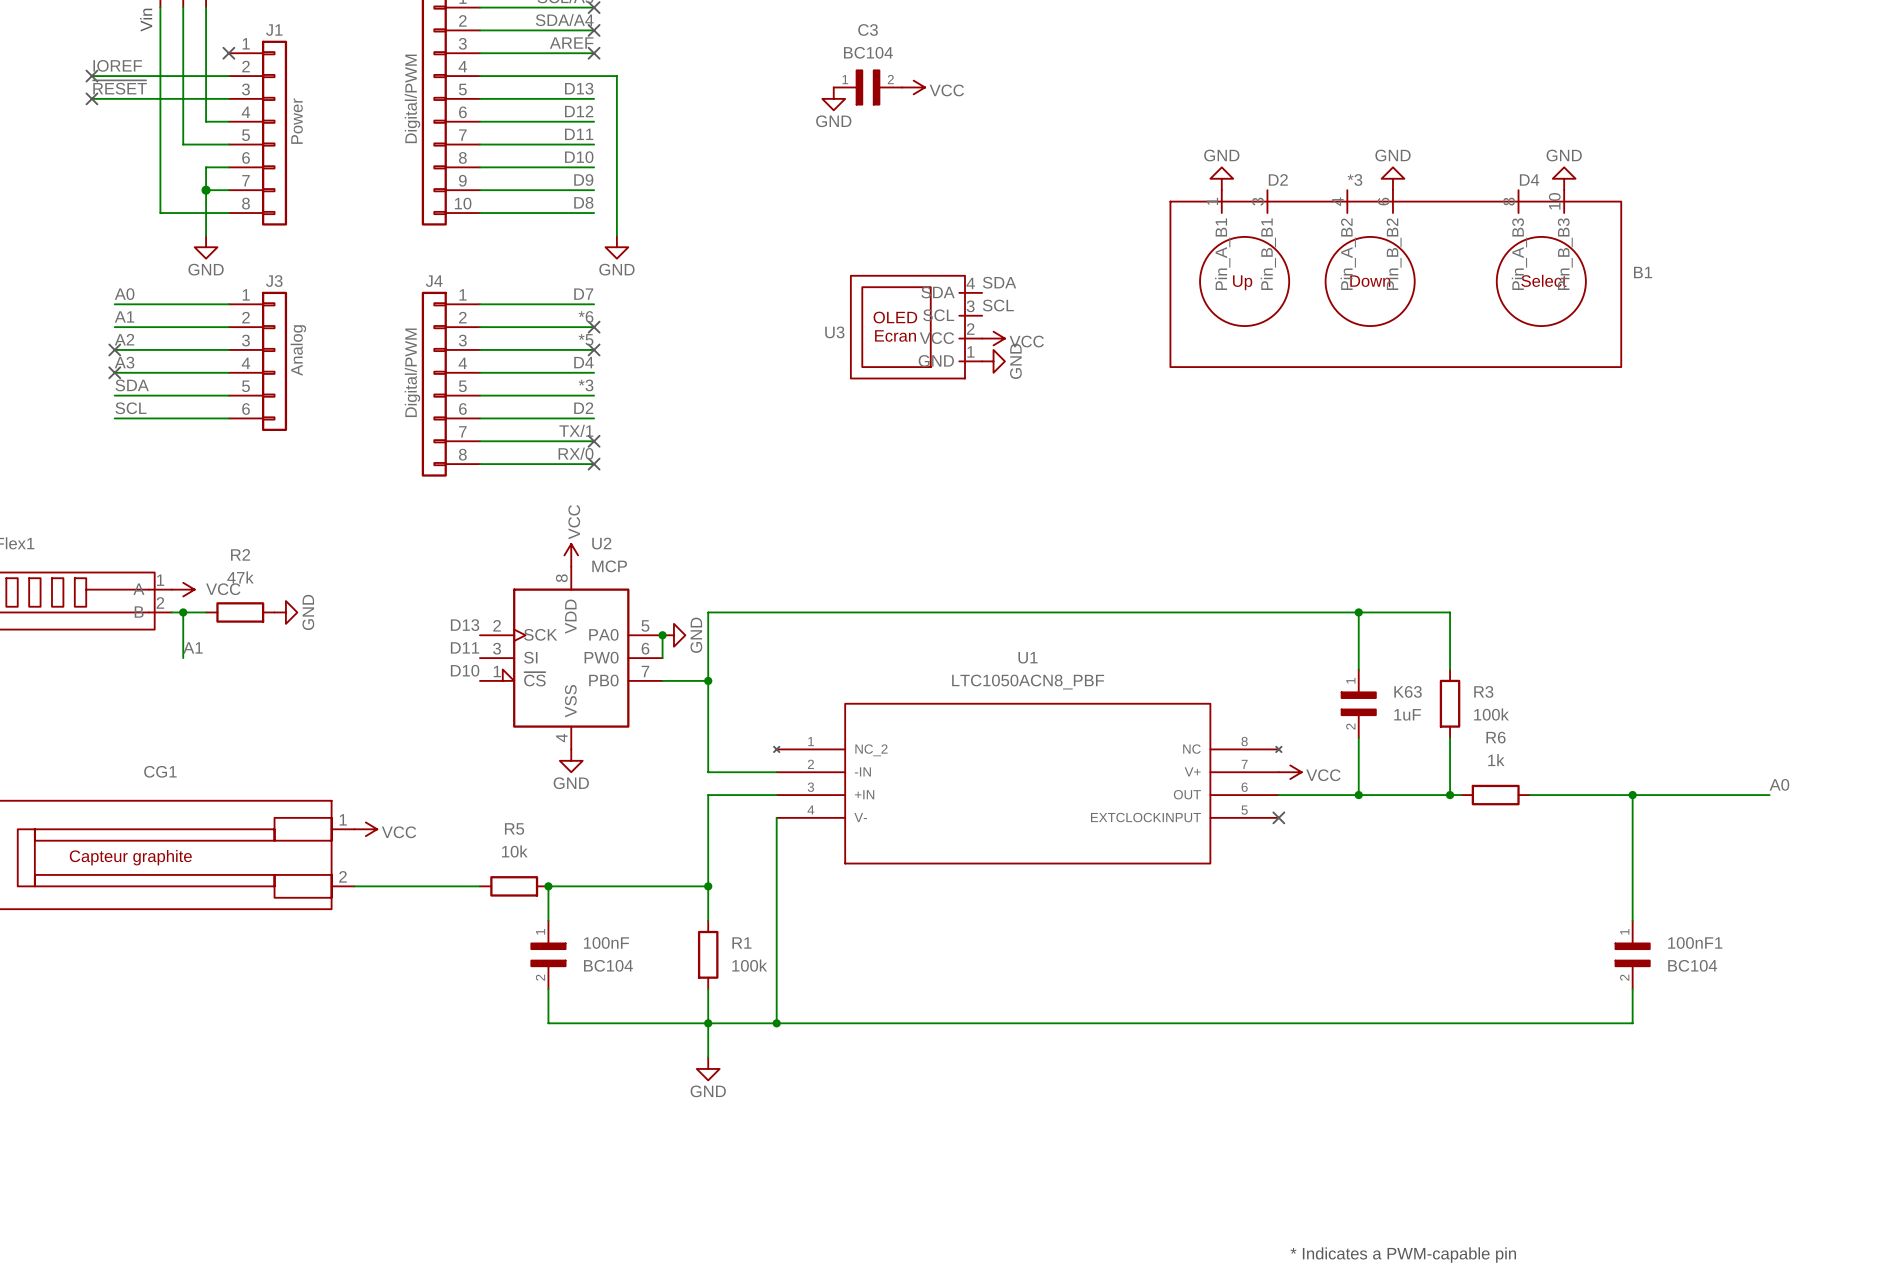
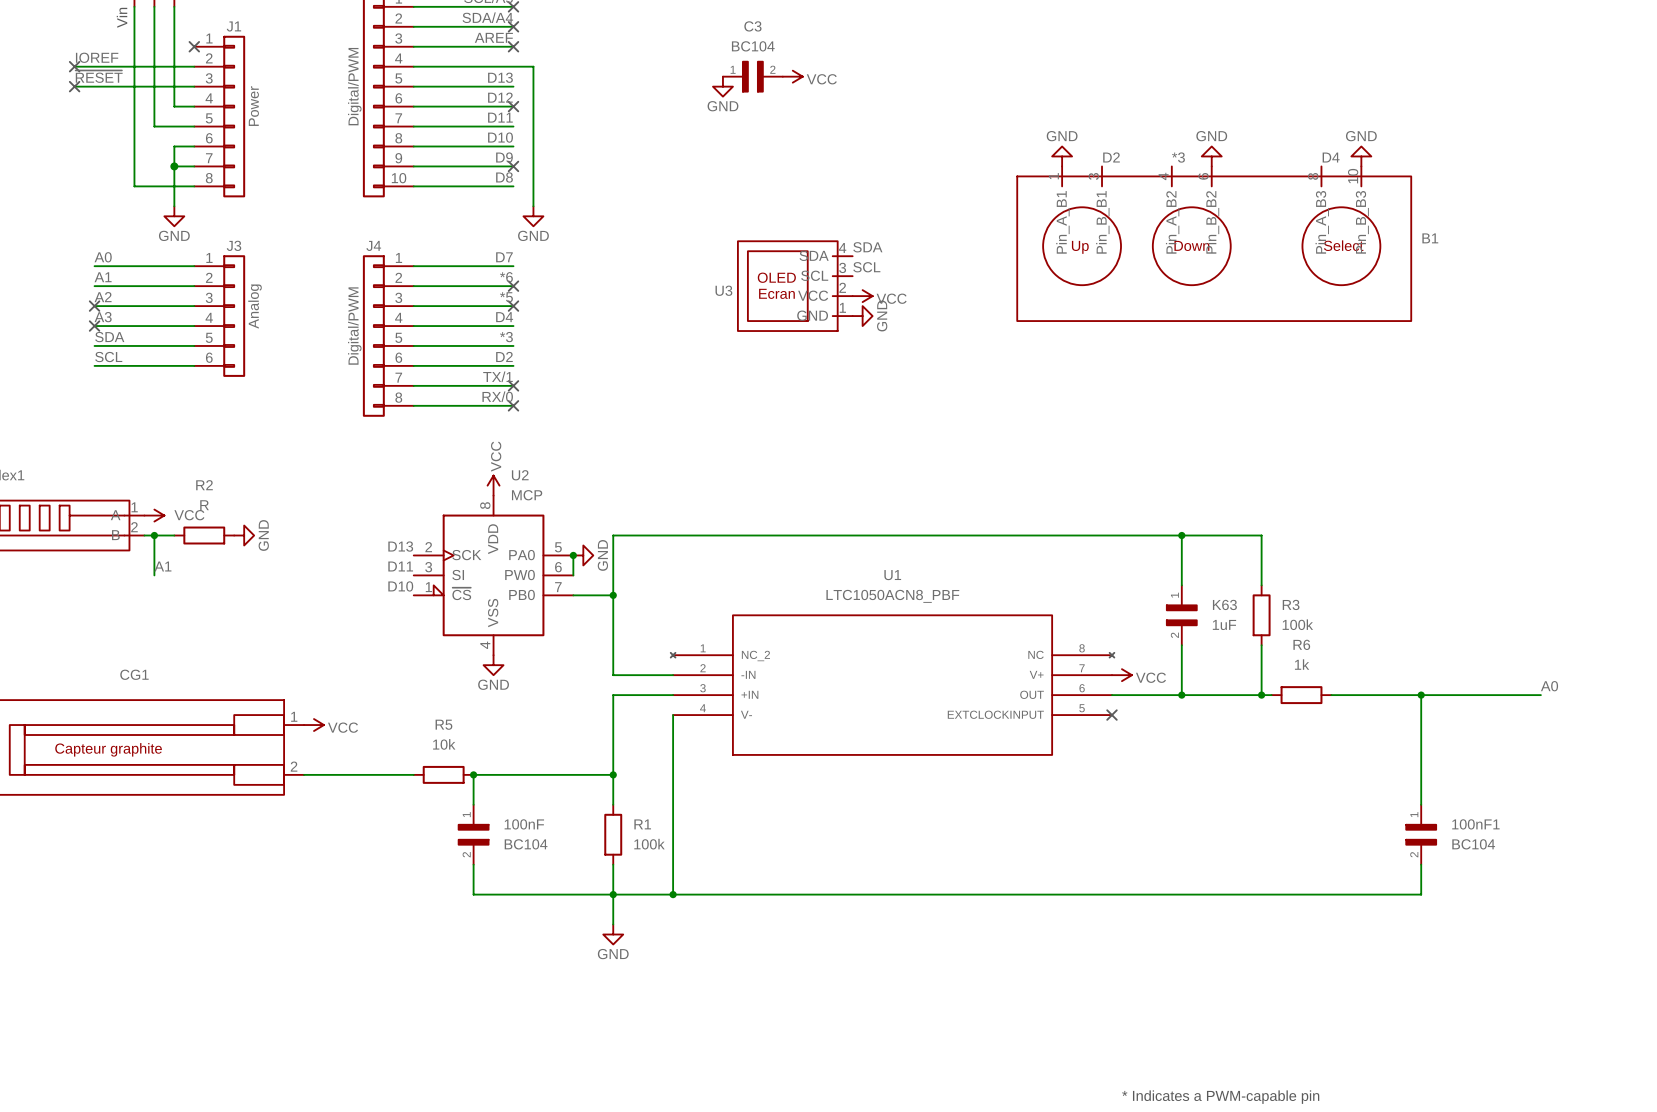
no-connect mark: none -> (513, 106)
no-connect mark: none -> (513, 166)
R2 value: 47k (240, 577) -> R (204, 505)

